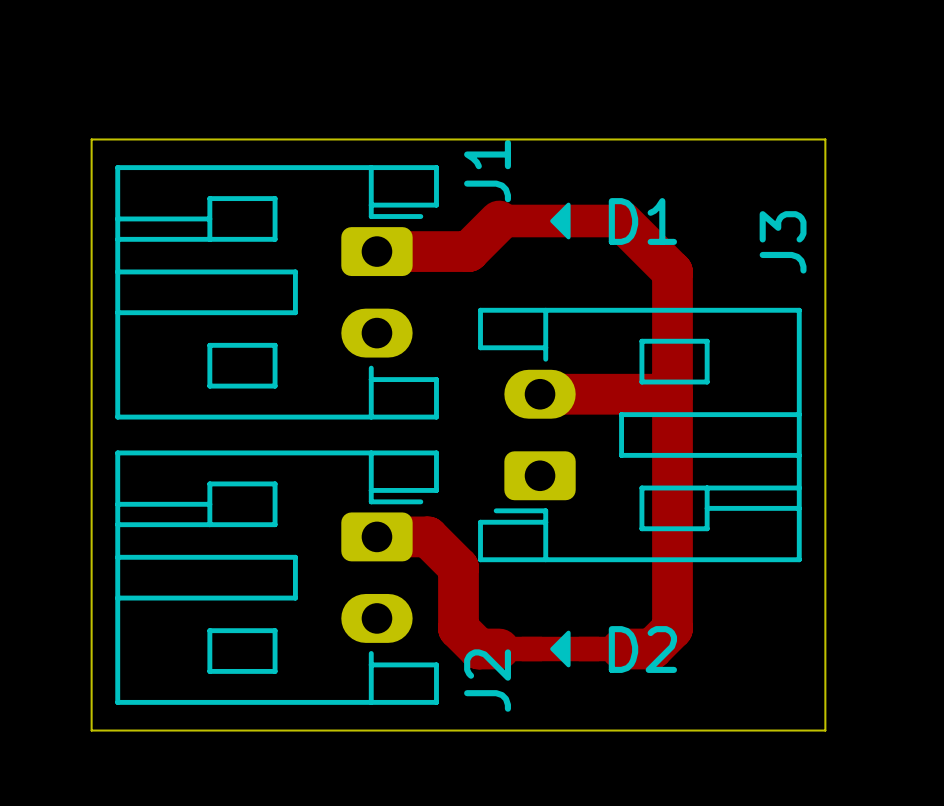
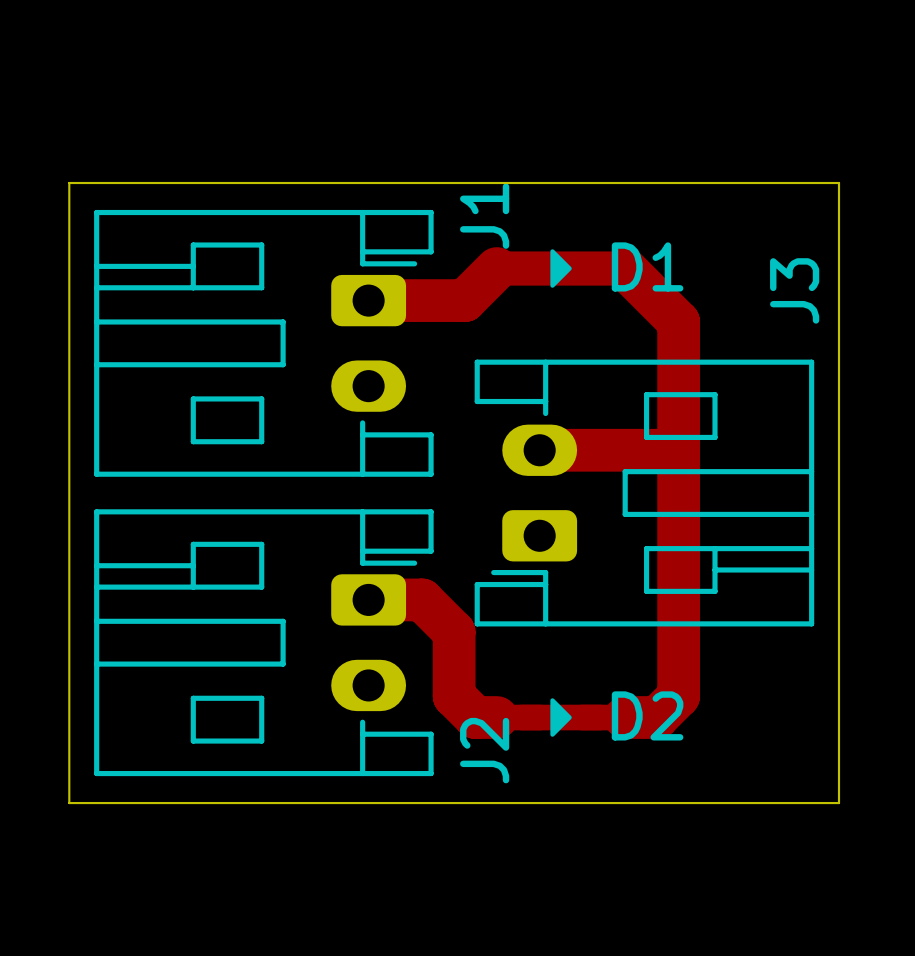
D1 rotation: 0° (560, 221) -> 180° (561, 268)
D2 rotation: 0° (560, 649) -> 180° (561, 717)

